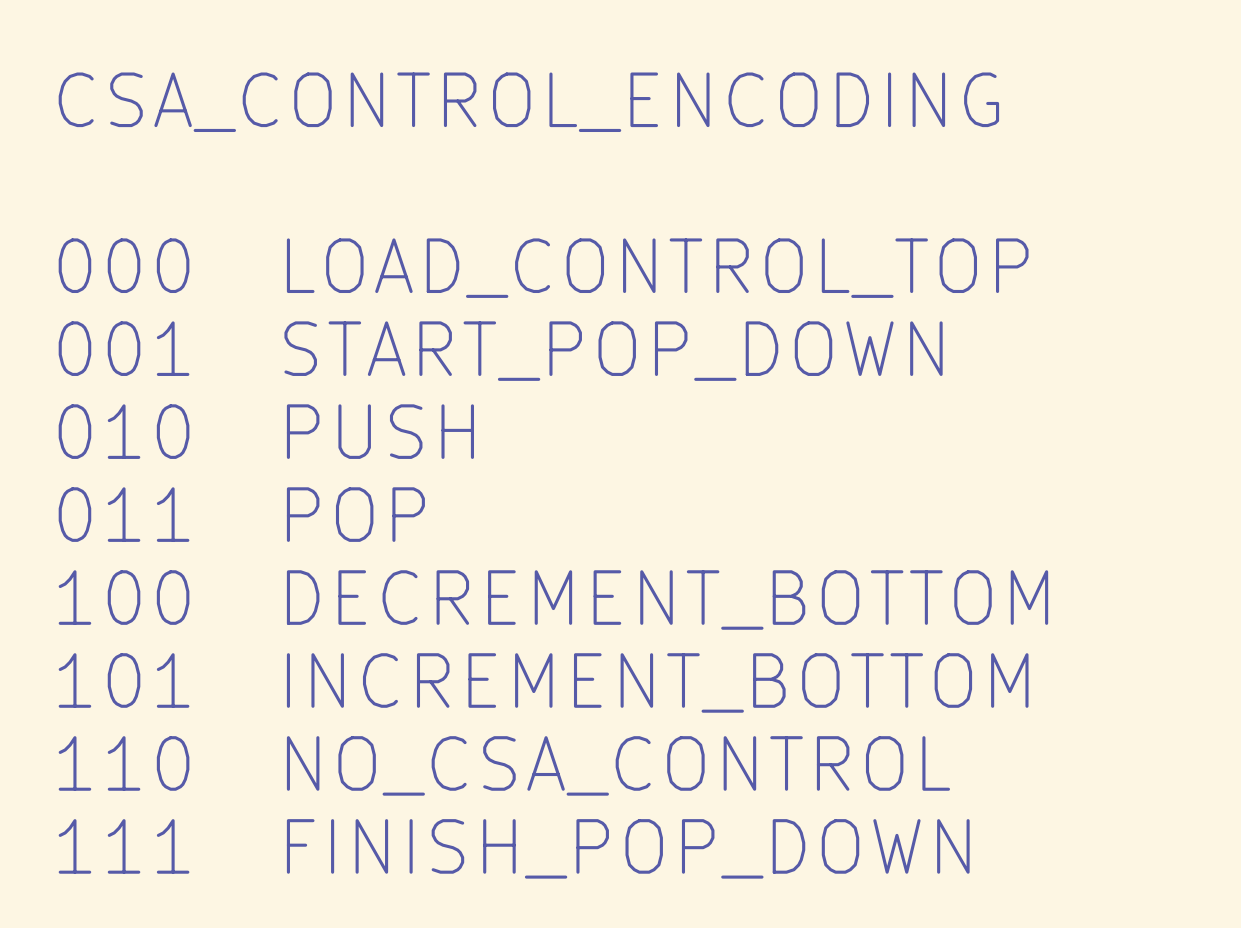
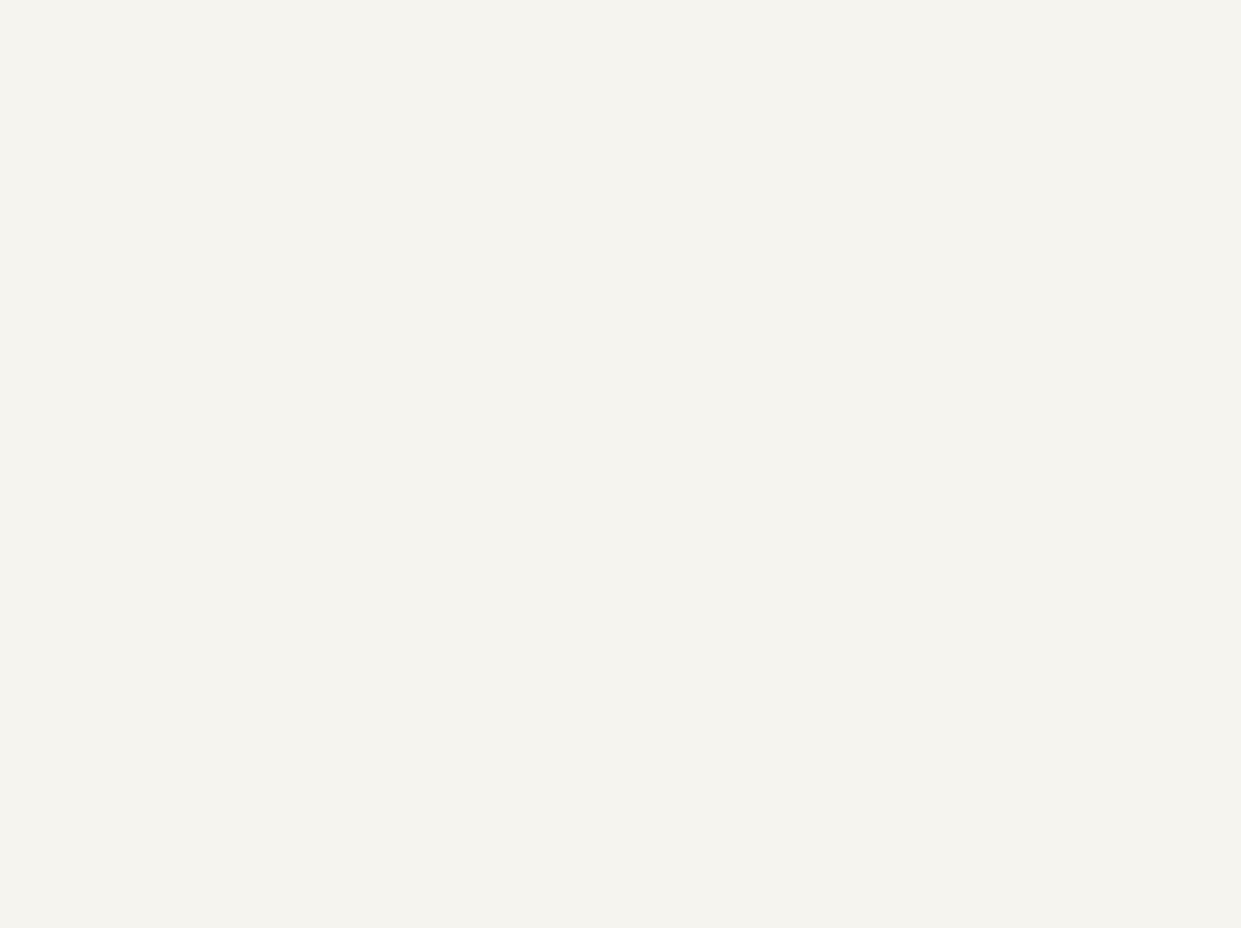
text: CSA_CONTROL_ENCODING (528, 102) -> none
text: 000 LOAD_CONTROL_TOP (543, 268) -> none
text: 001 START_POP_DOWN (500, 351) -> none
text: 010 PUSH (266, 431) -> none
text: 011 POP (241, 514) -> none
text: 100 DECREMENT_BOTTOM (553, 600) -> none
text: 101 INCREMENT_BOTTOM (543, 682) -> none
text: 110 NO_CSA_CONTROL (504, 765) -> none
text: 111 FINISH_POP_DOWN (514, 848) -> none

